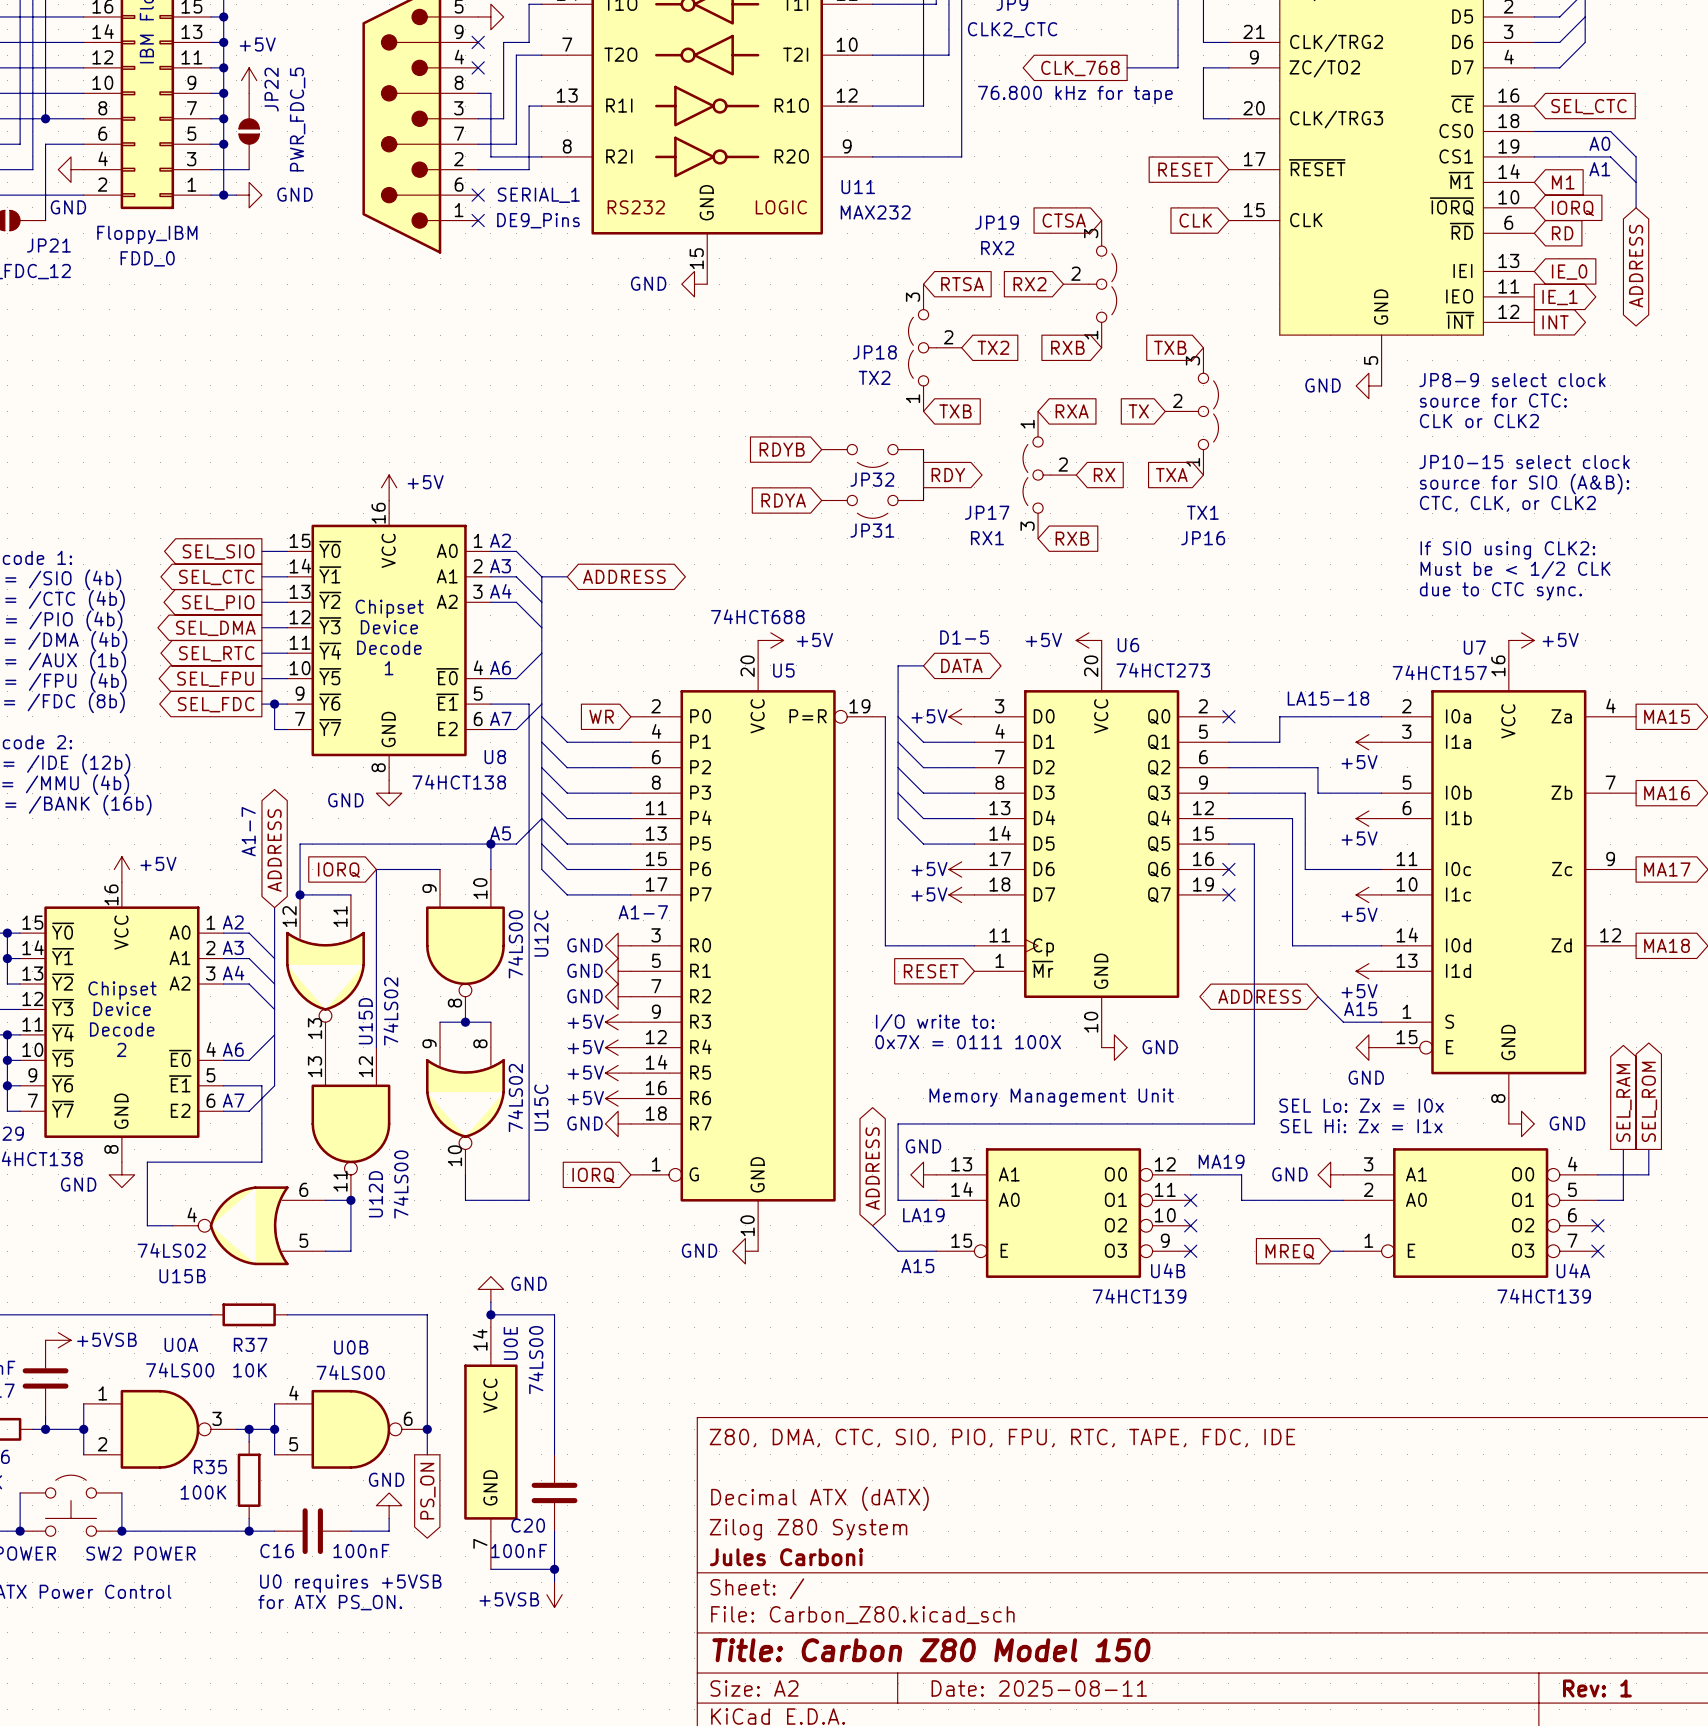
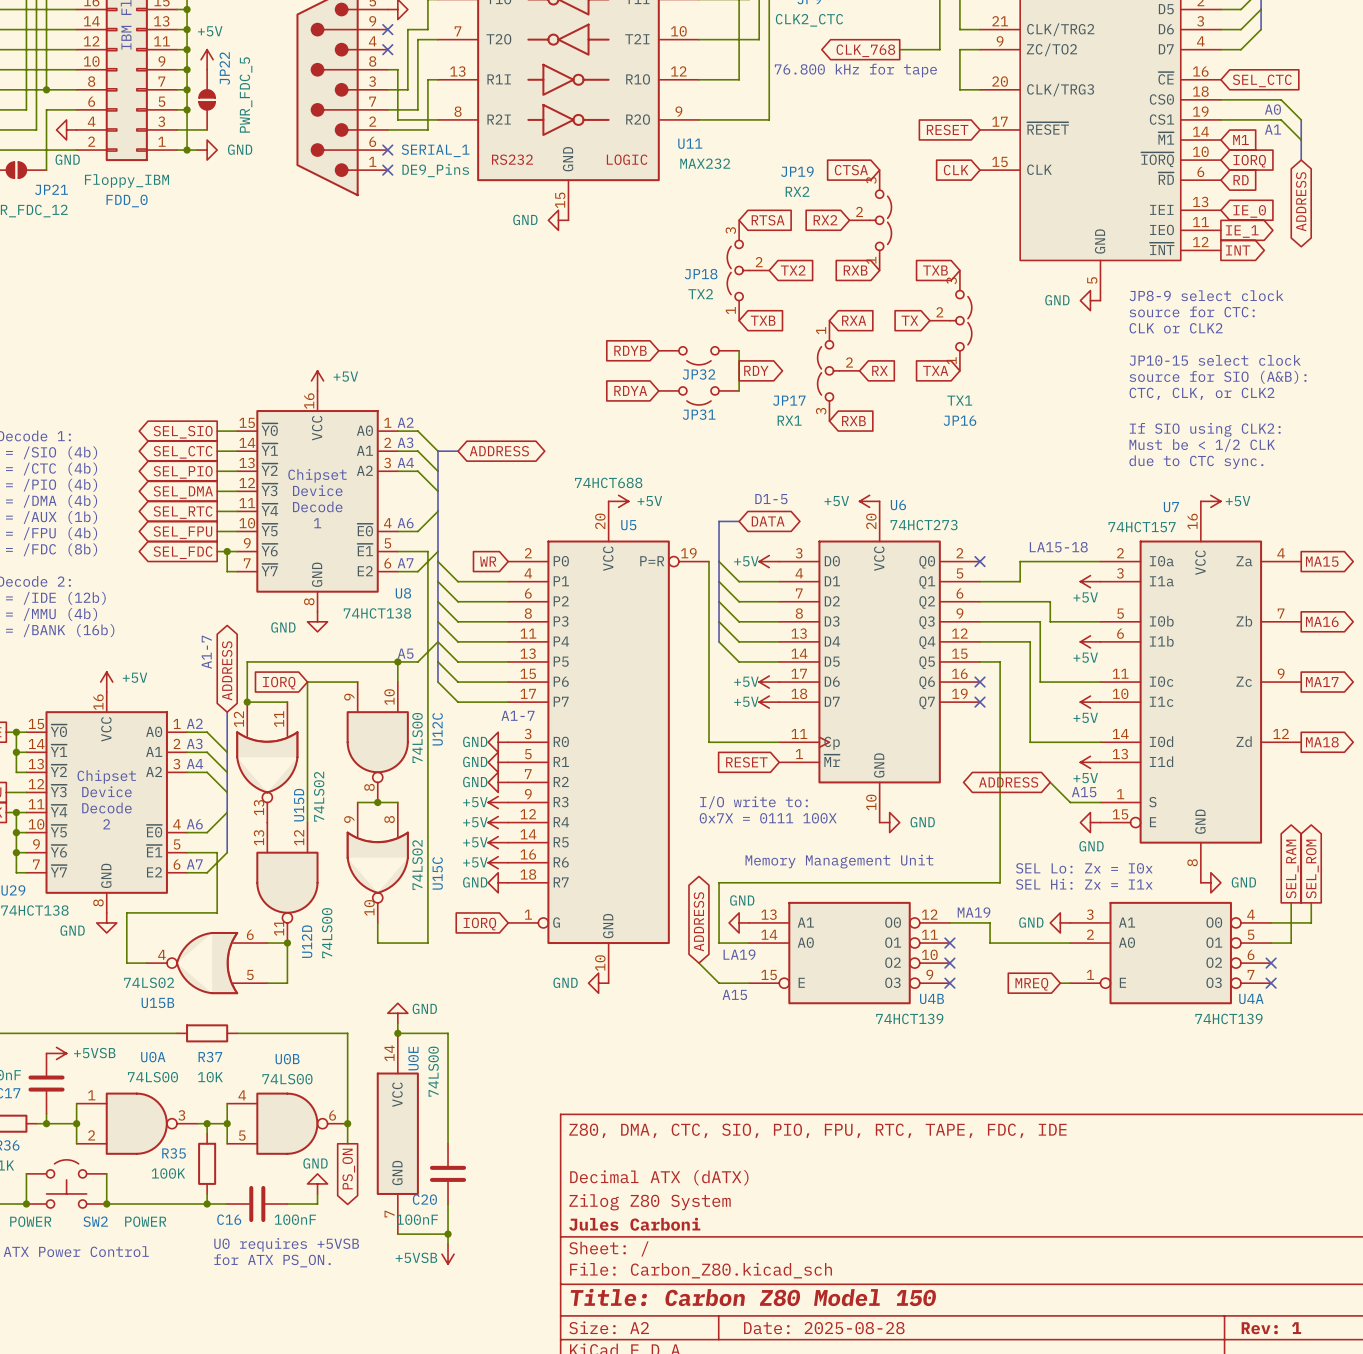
title block: Date: 2025-08-11 (1039, 1688) -> Date: 2025-08-28 (824, 1328)

